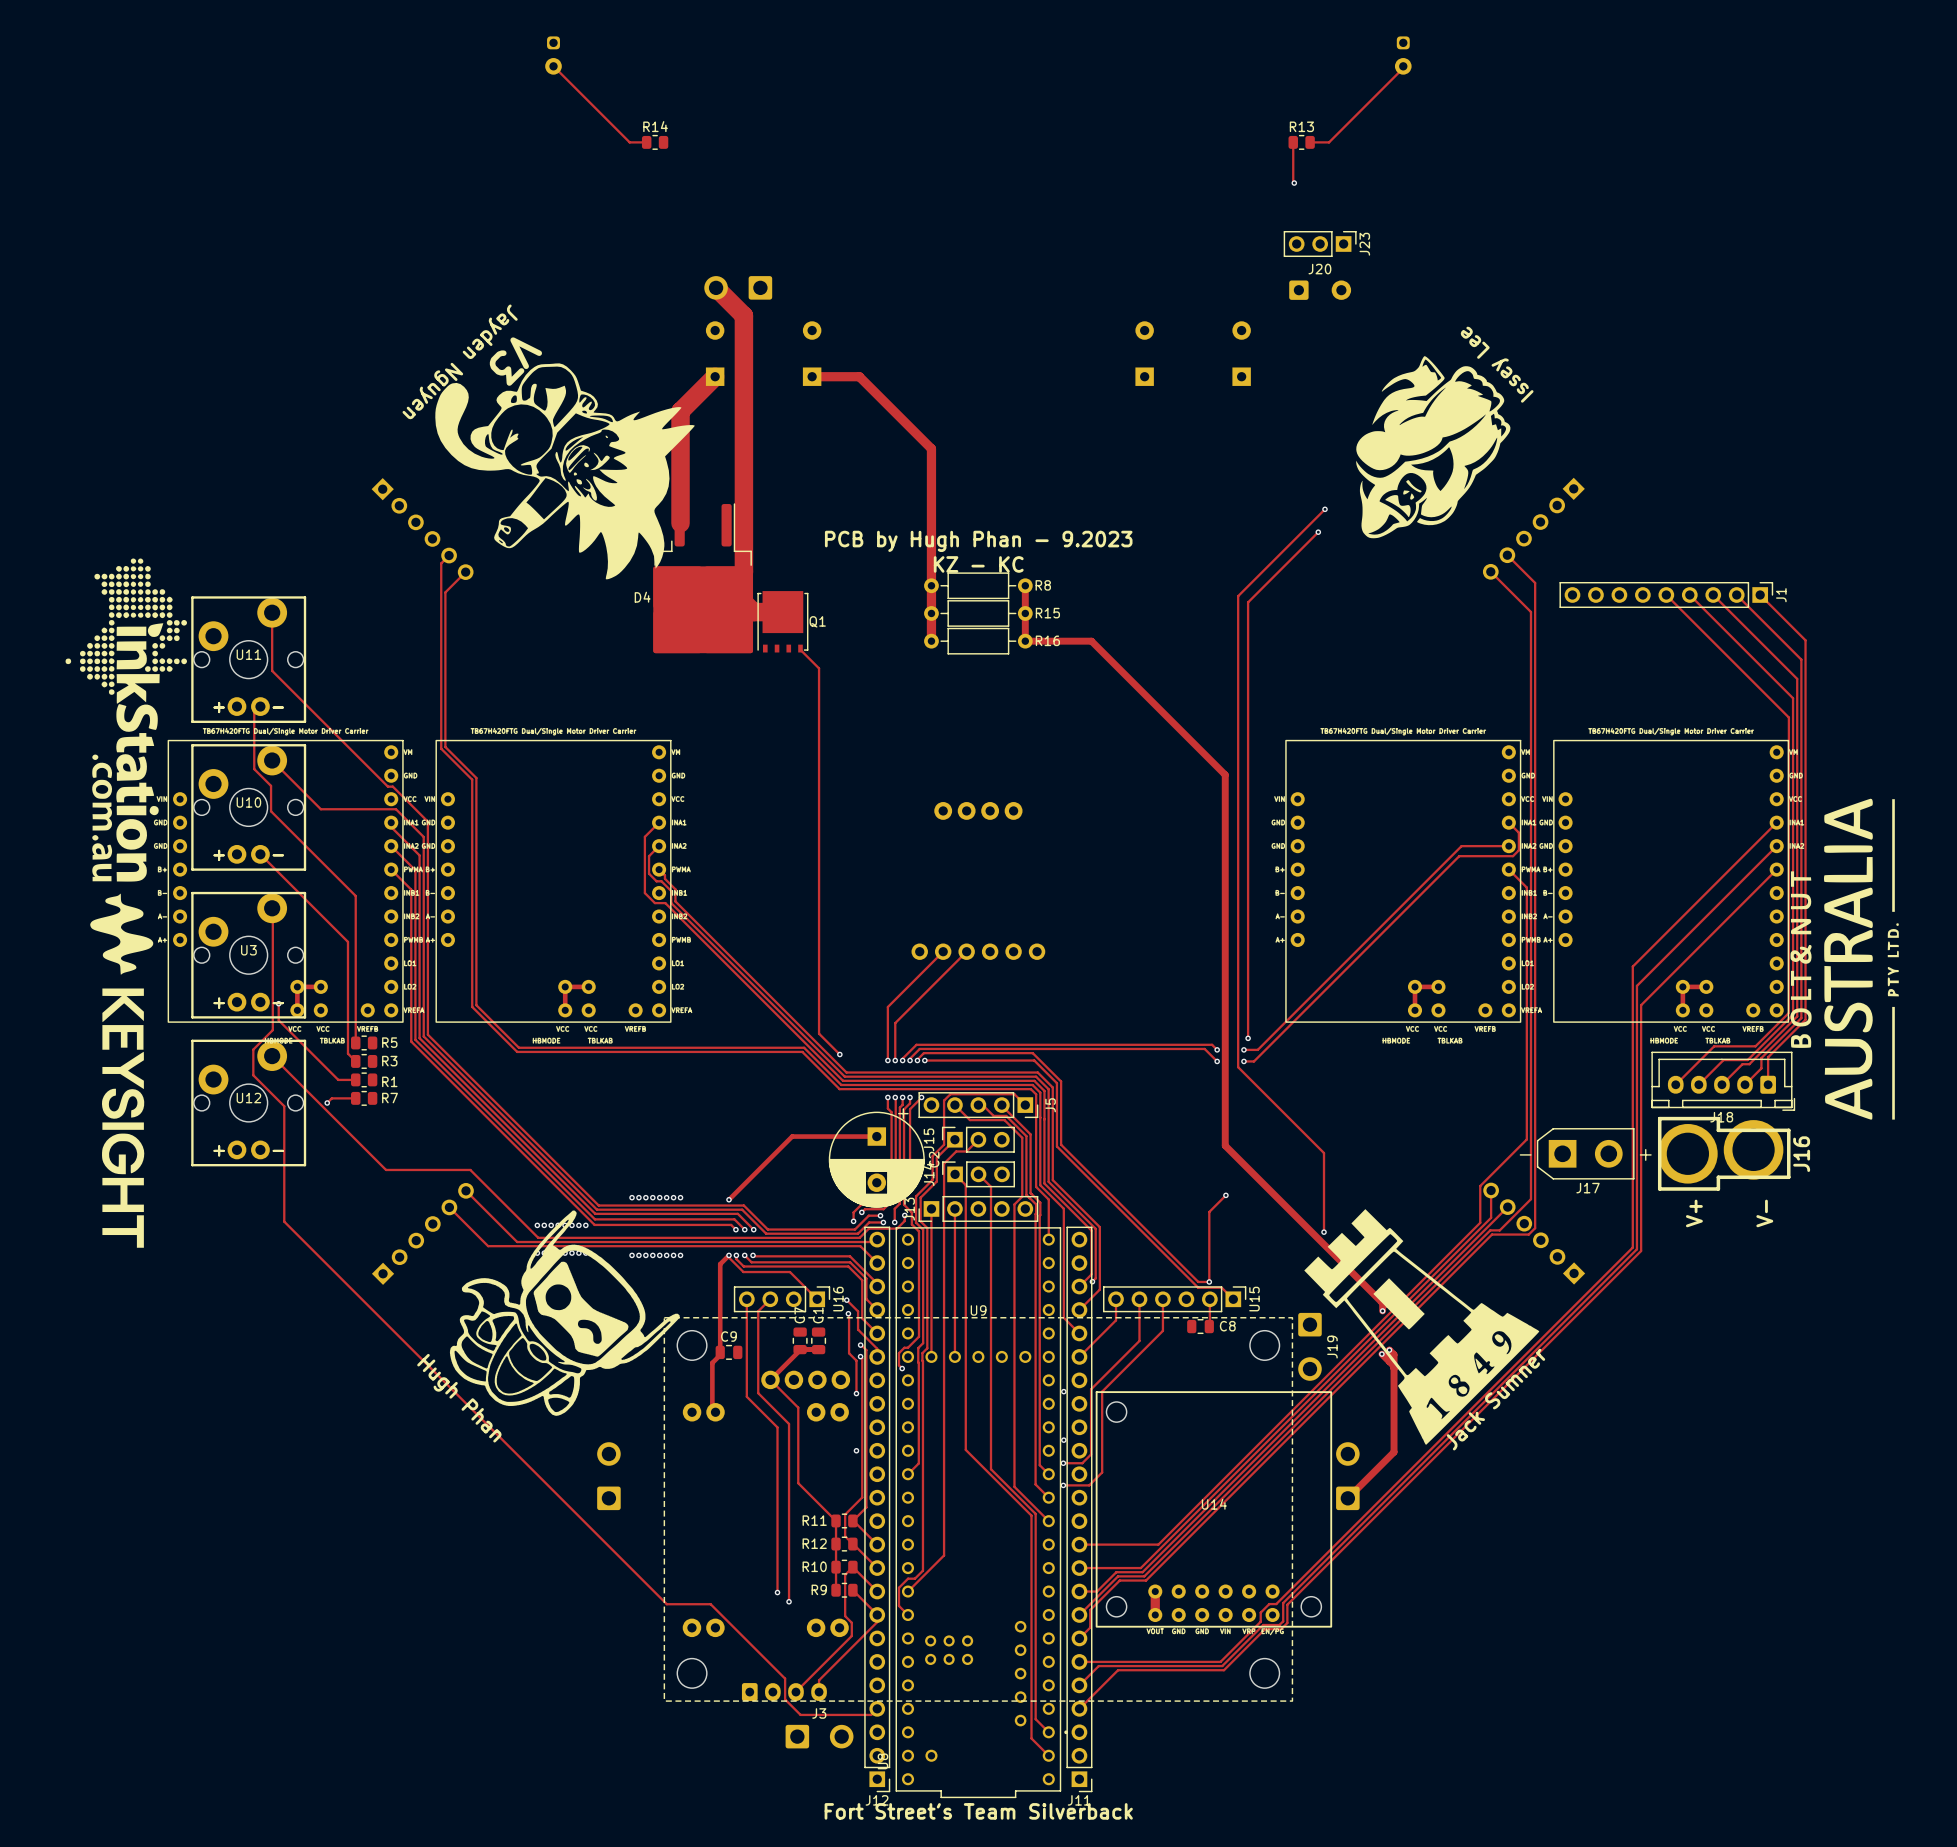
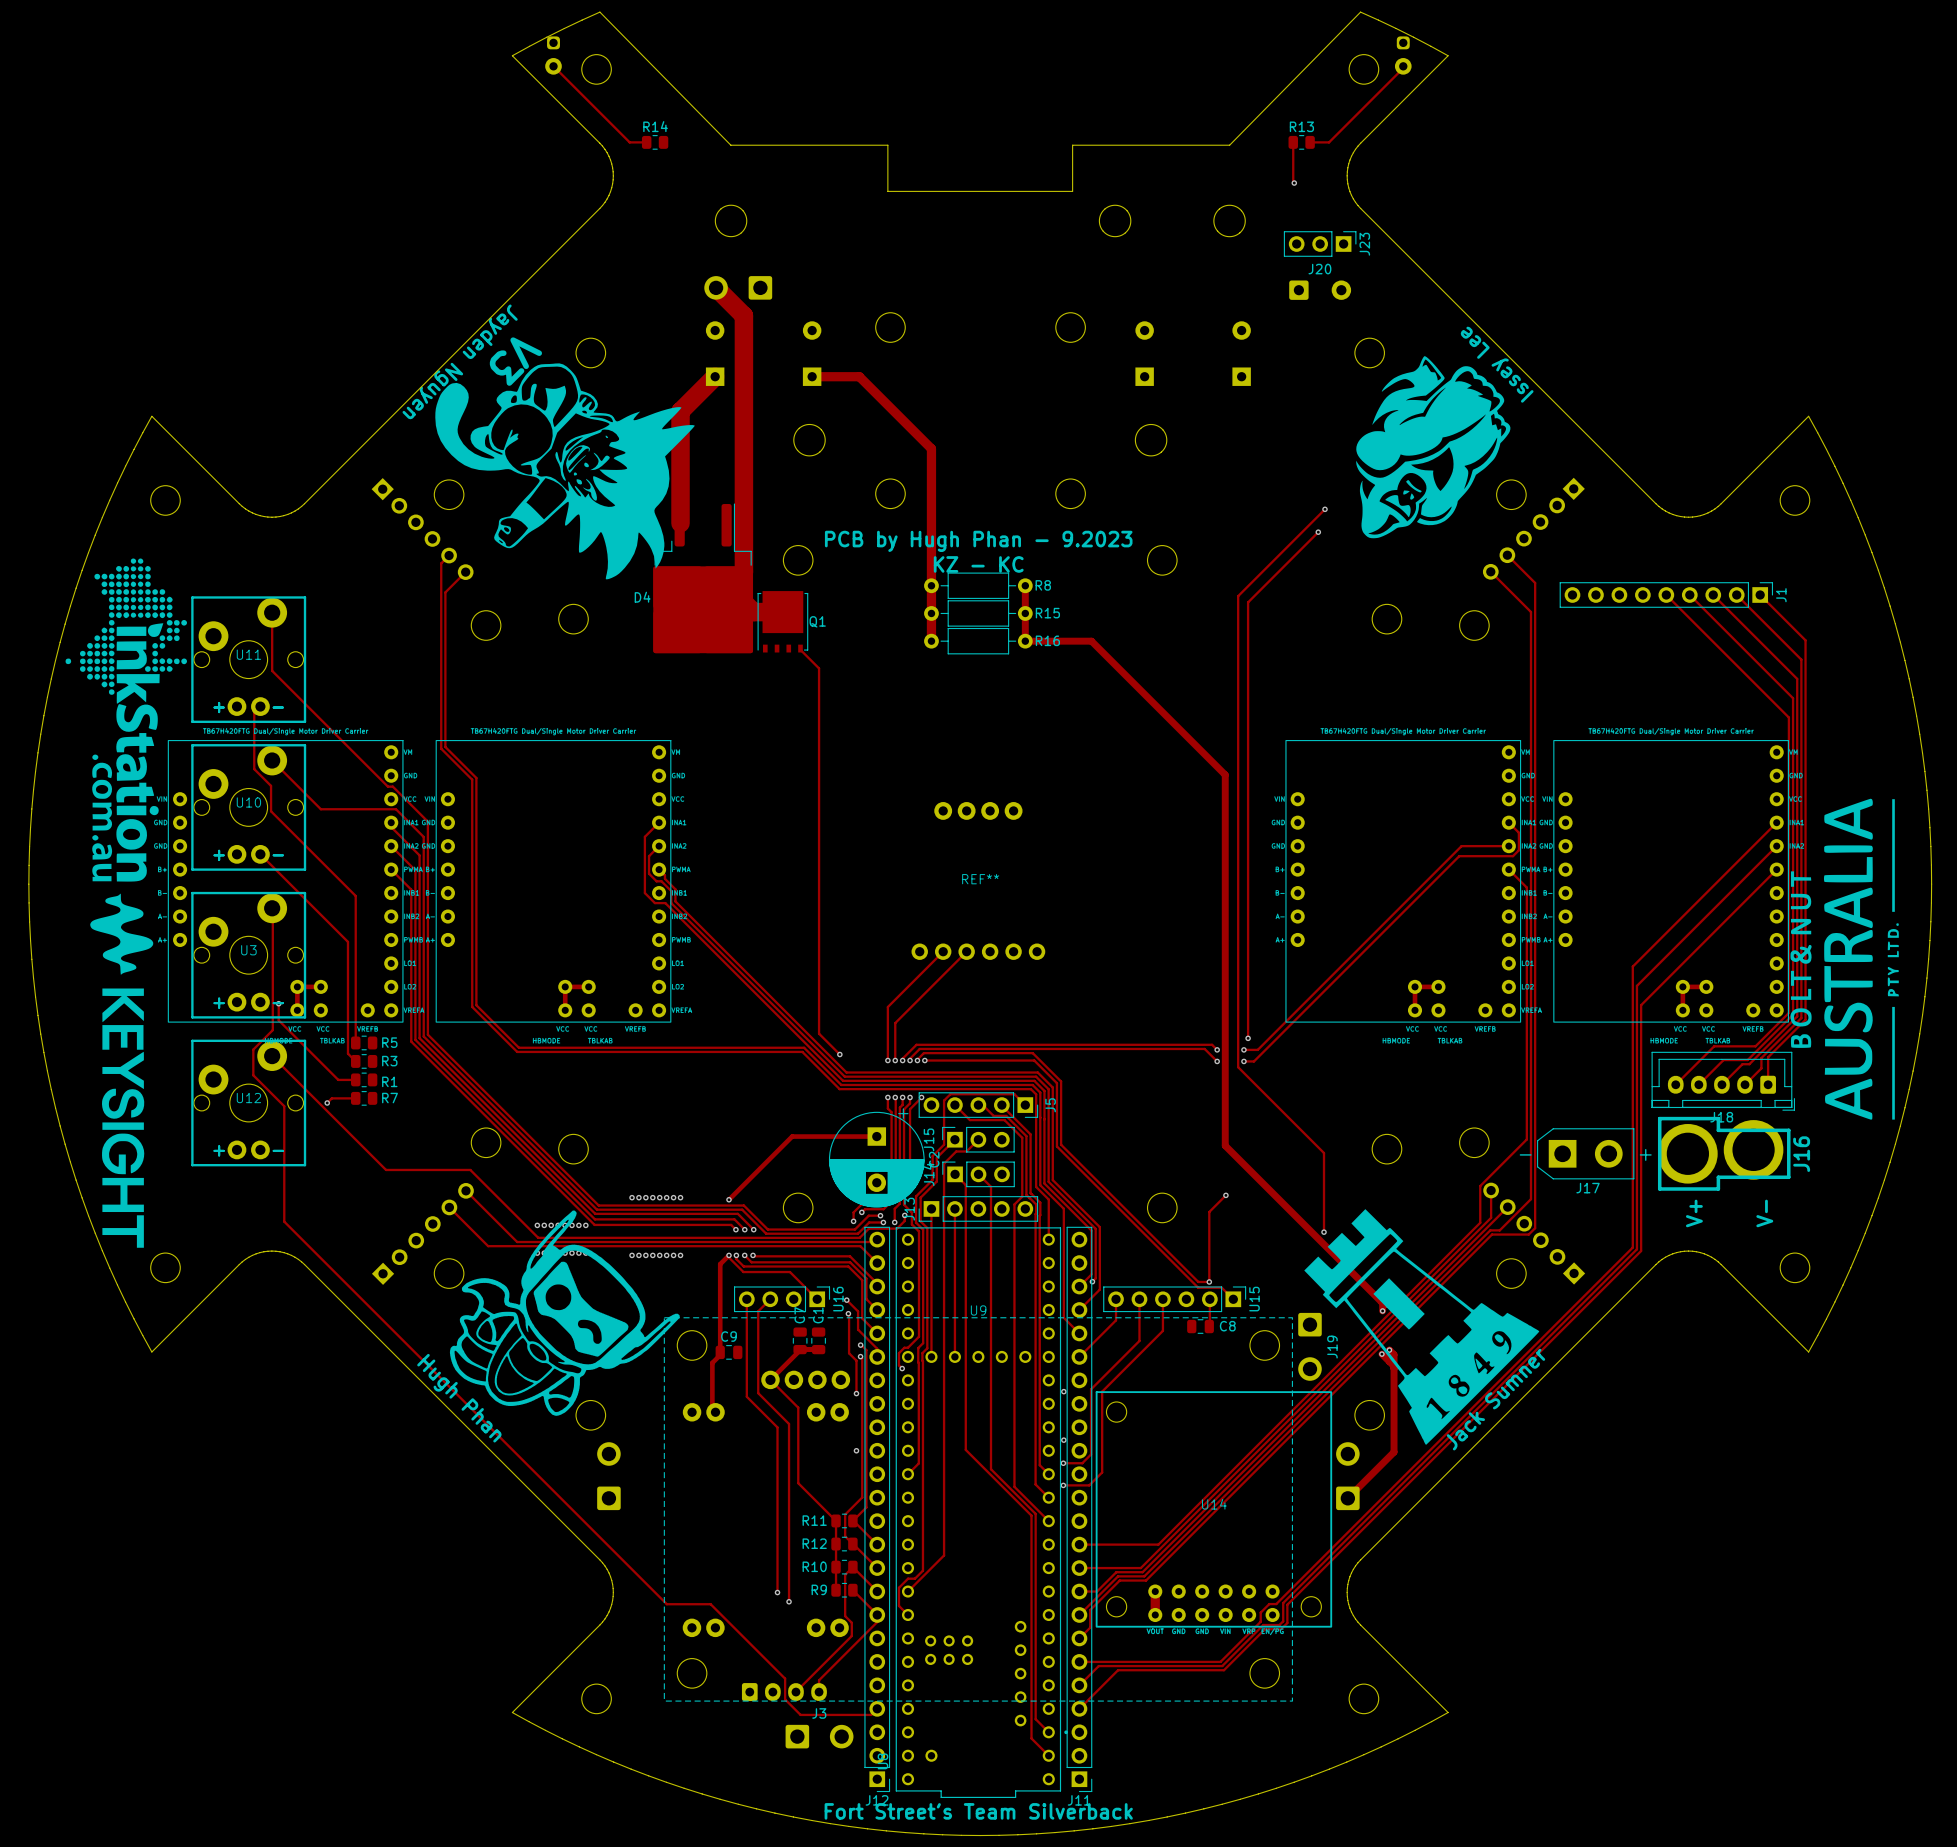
REF**: none -> (980, 923)

